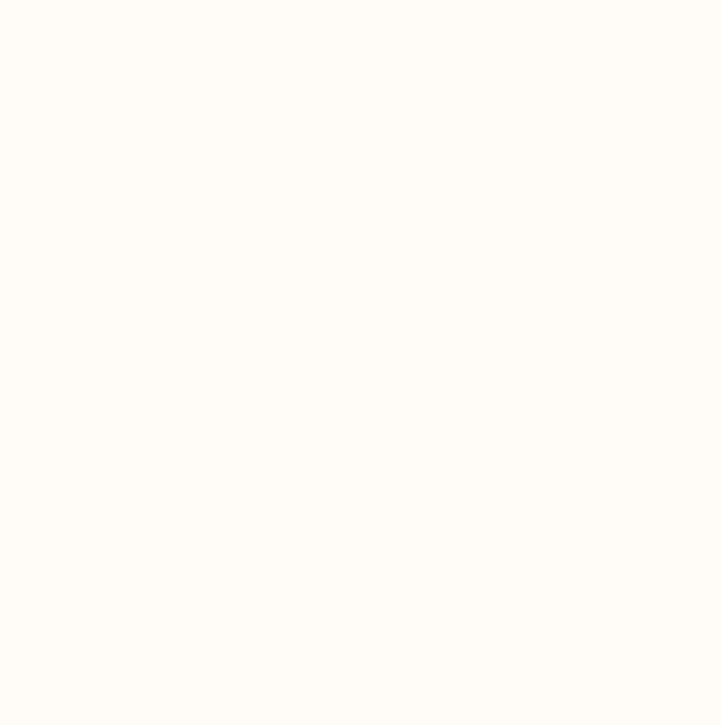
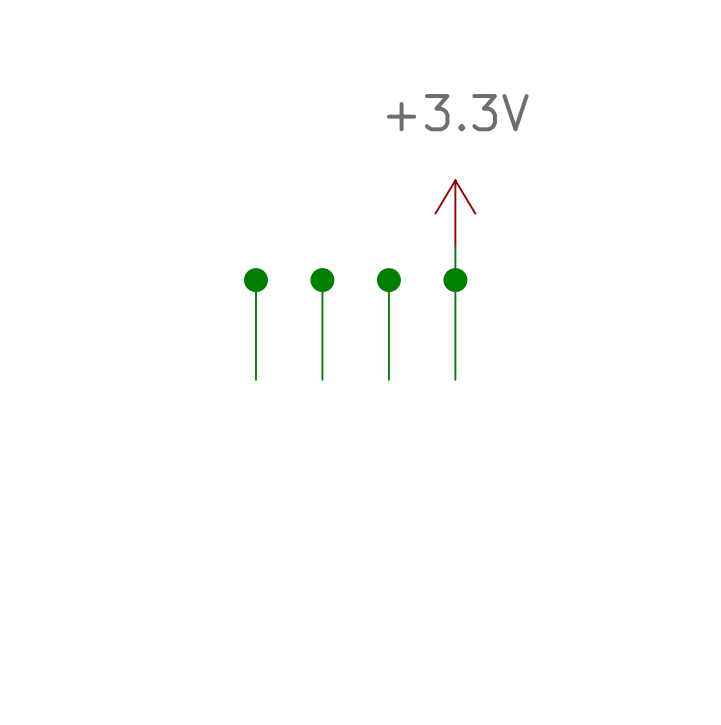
power symbol: none -> +3.3V (455, 213)
wire: none -> (455, 246) (455, 379)
wire: none -> (255, 280) (255, 379)
junction: none -> (255, 280)
wire: none -> (322, 280) (322, 379)
junction: none -> (322, 280)
wire: none -> (388, 280) (388, 379)
junction: none -> (388, 280)
junction: none -> (455, 280)

